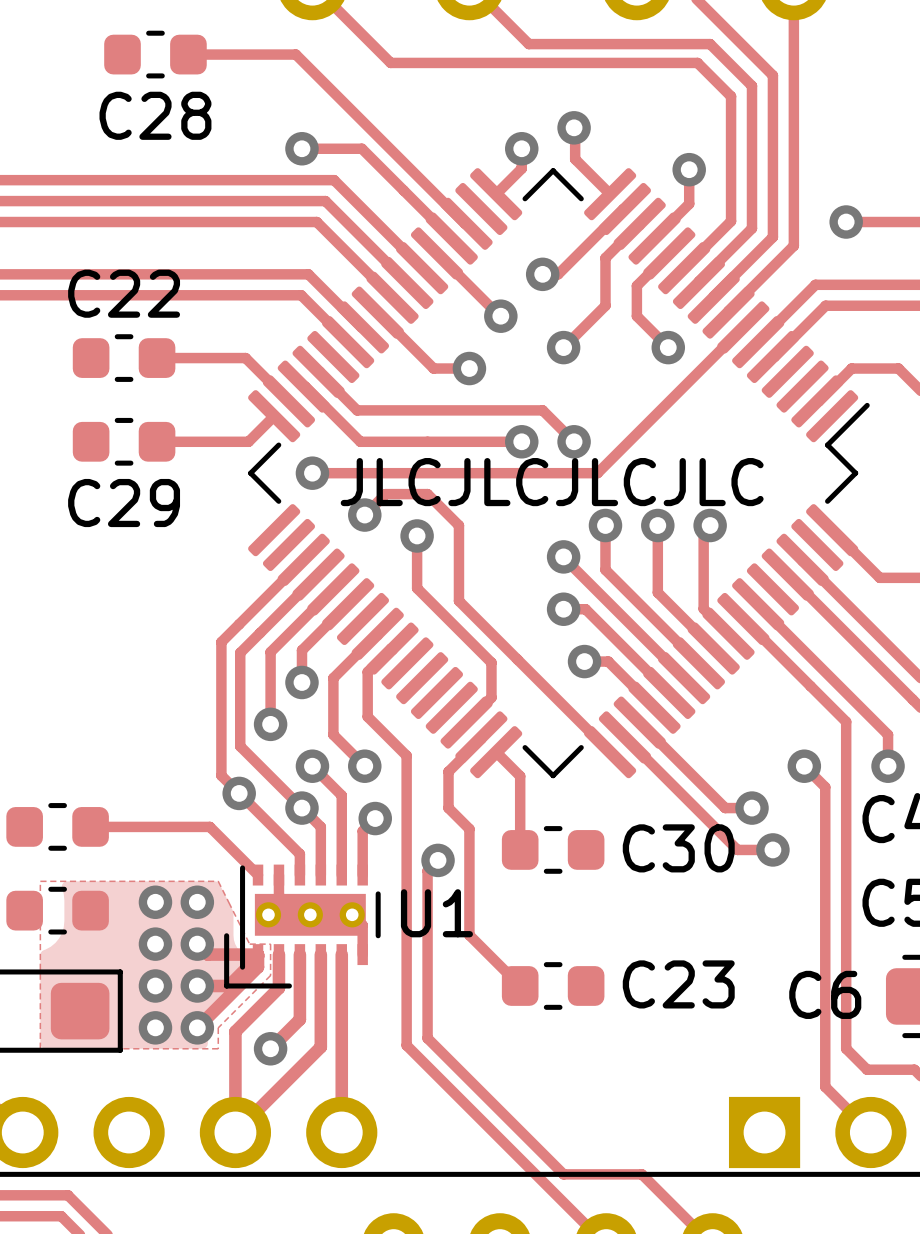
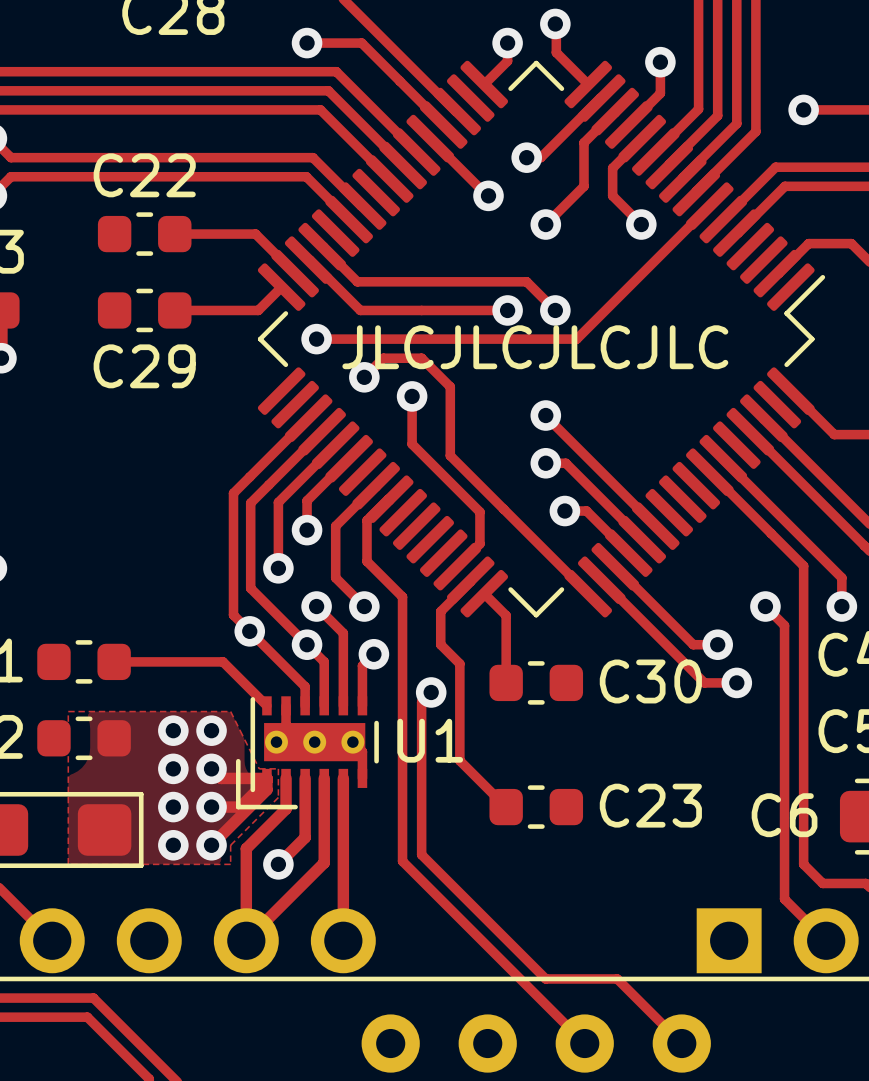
track: (377, 312) (433, 368) (469, 368) -> none
via: (469, 368) -> none
track: (605, 525) (605, 569) (698, 663) -> none
via: (605, 525) -> none
track: (657, 525) (657, 592) (713, 648) -> none
via: (657, 525) -> none
track: (710, 525) (703, 531) (703, 608) (728, 633) -> none
via: (710, 525) -> none

